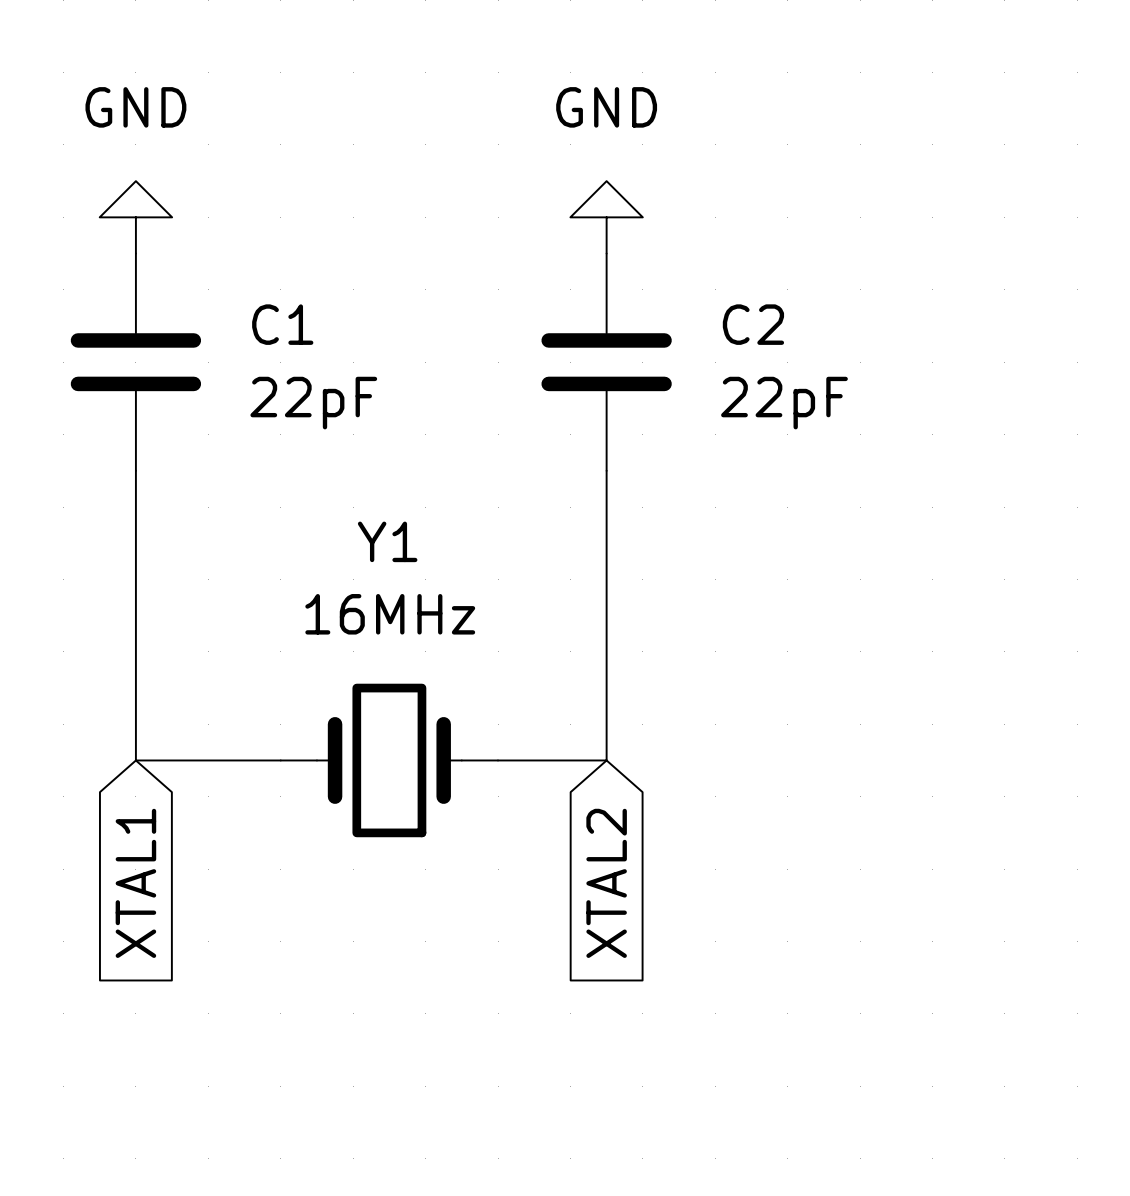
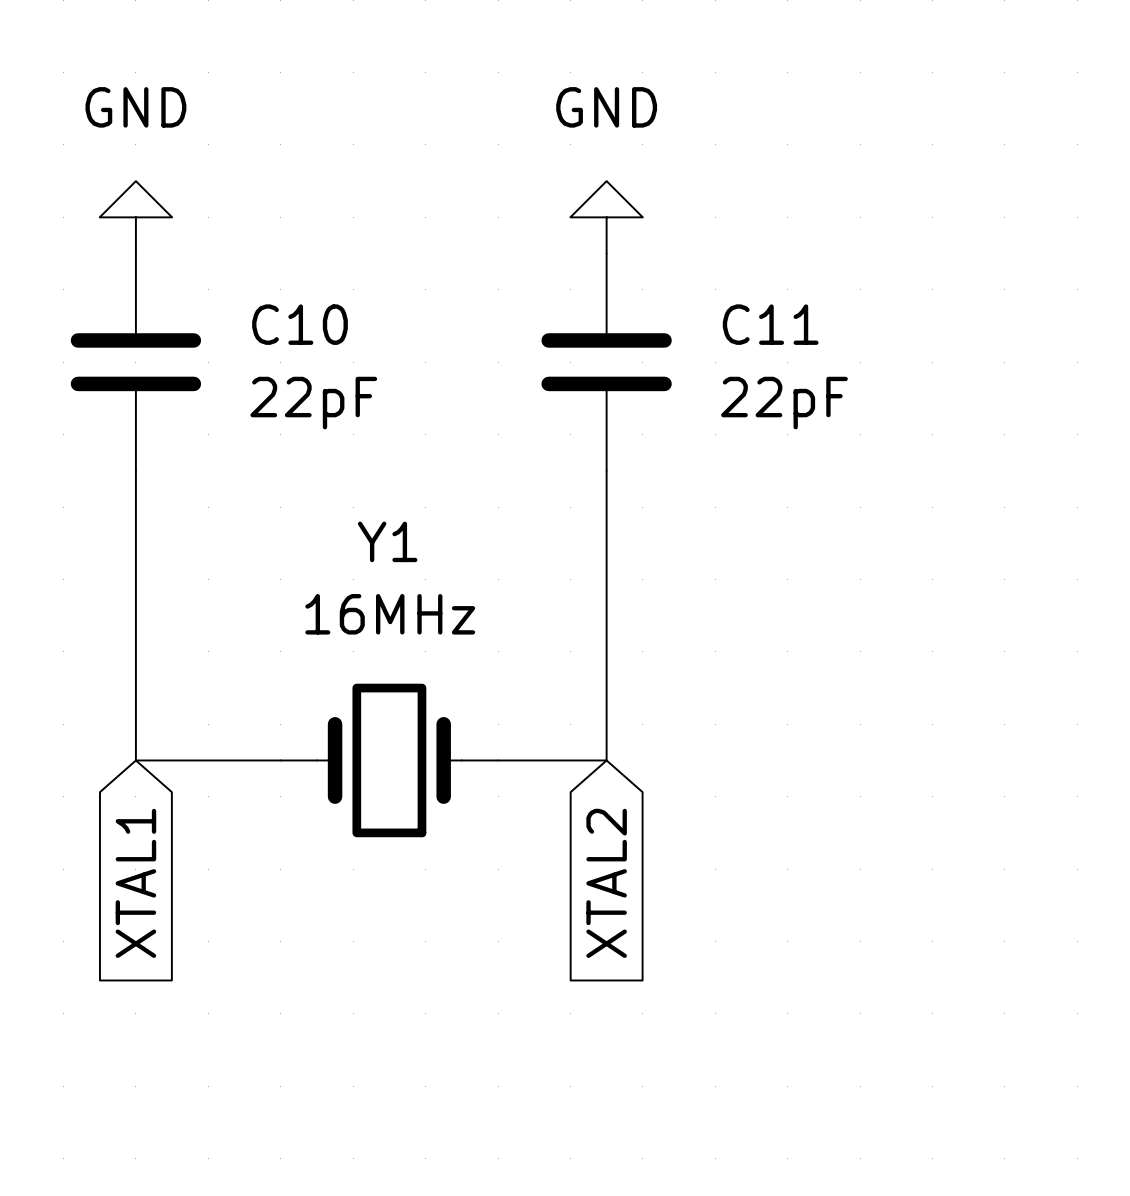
C1 name: C1 (282, 324) -> C10 (299, 324)
C2 name: C2 (753, 324) -> C11 (770, 324)

